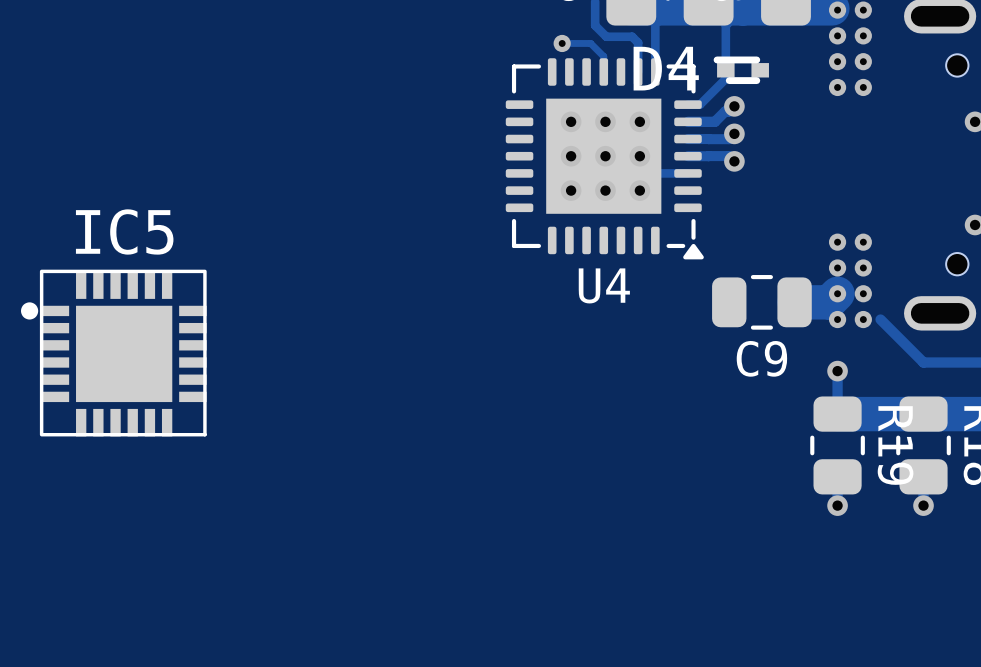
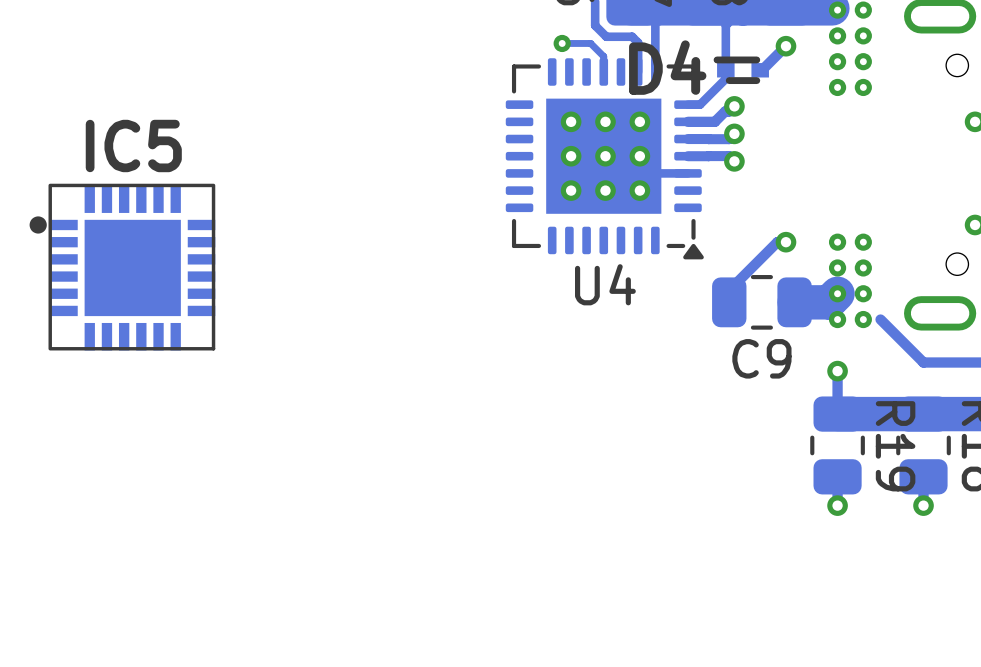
track: none -> (785, 46) (761, 70)
via: none -> (785, 46)
track: none -> (785, 242) (777, 242) (729, 290)
via: none -> (785, 242)
IC5 position: (113, 353) -> (122, 267)

